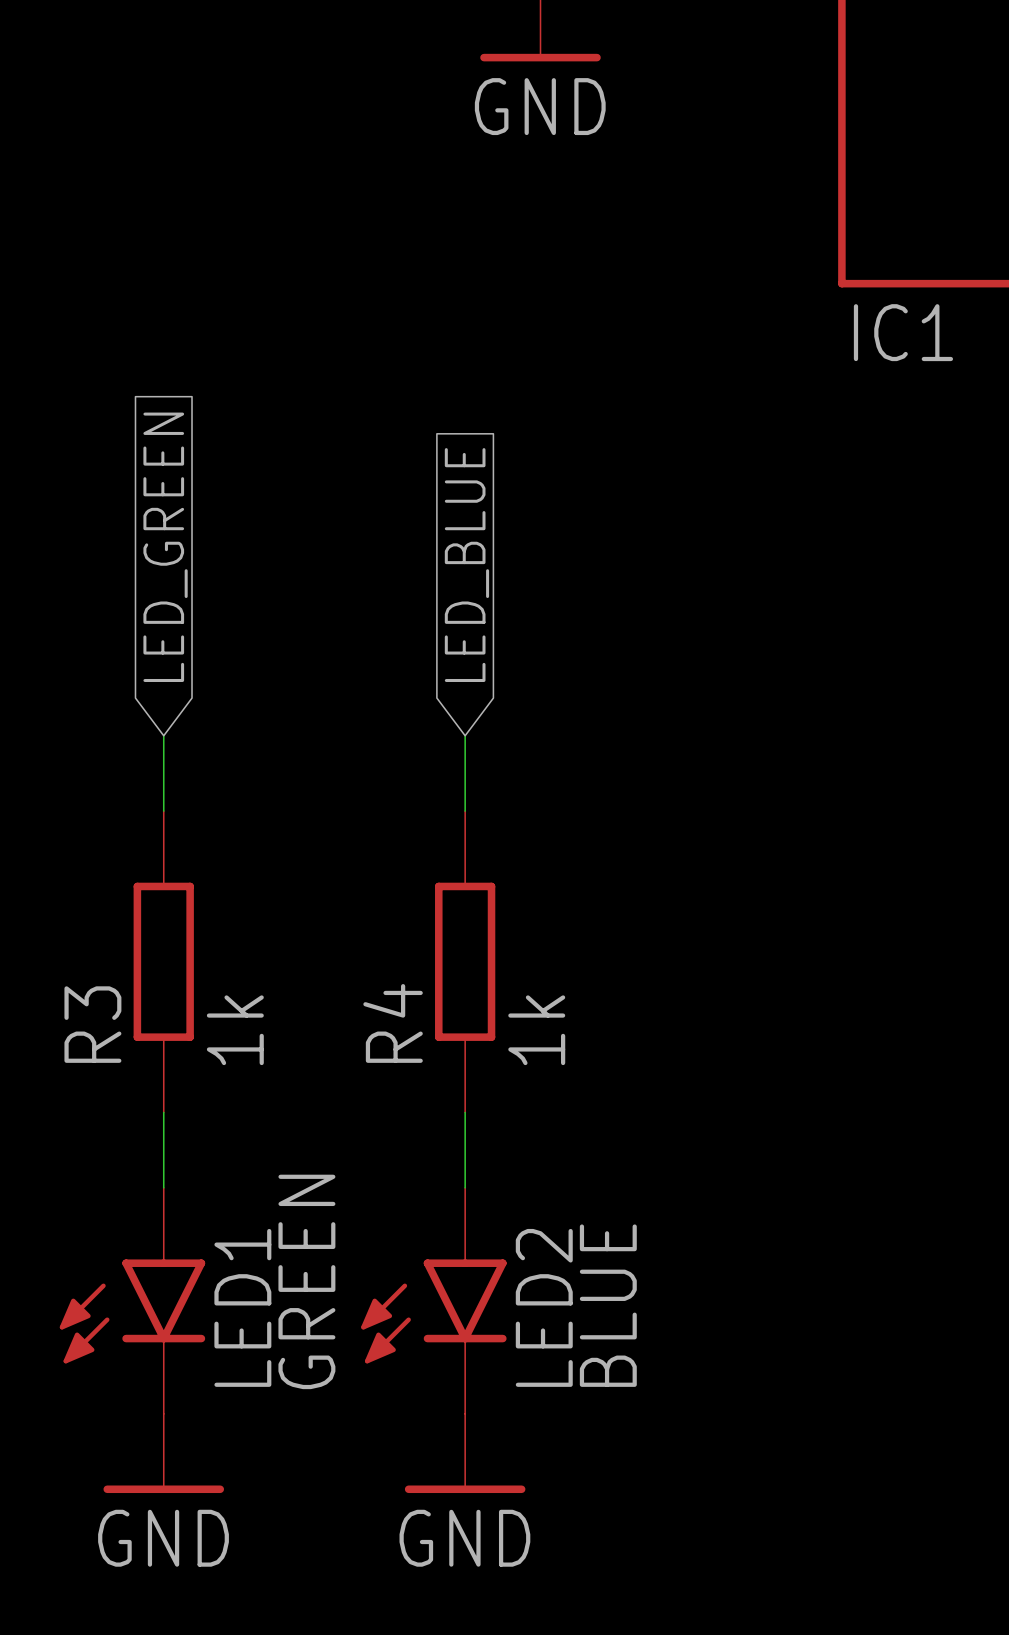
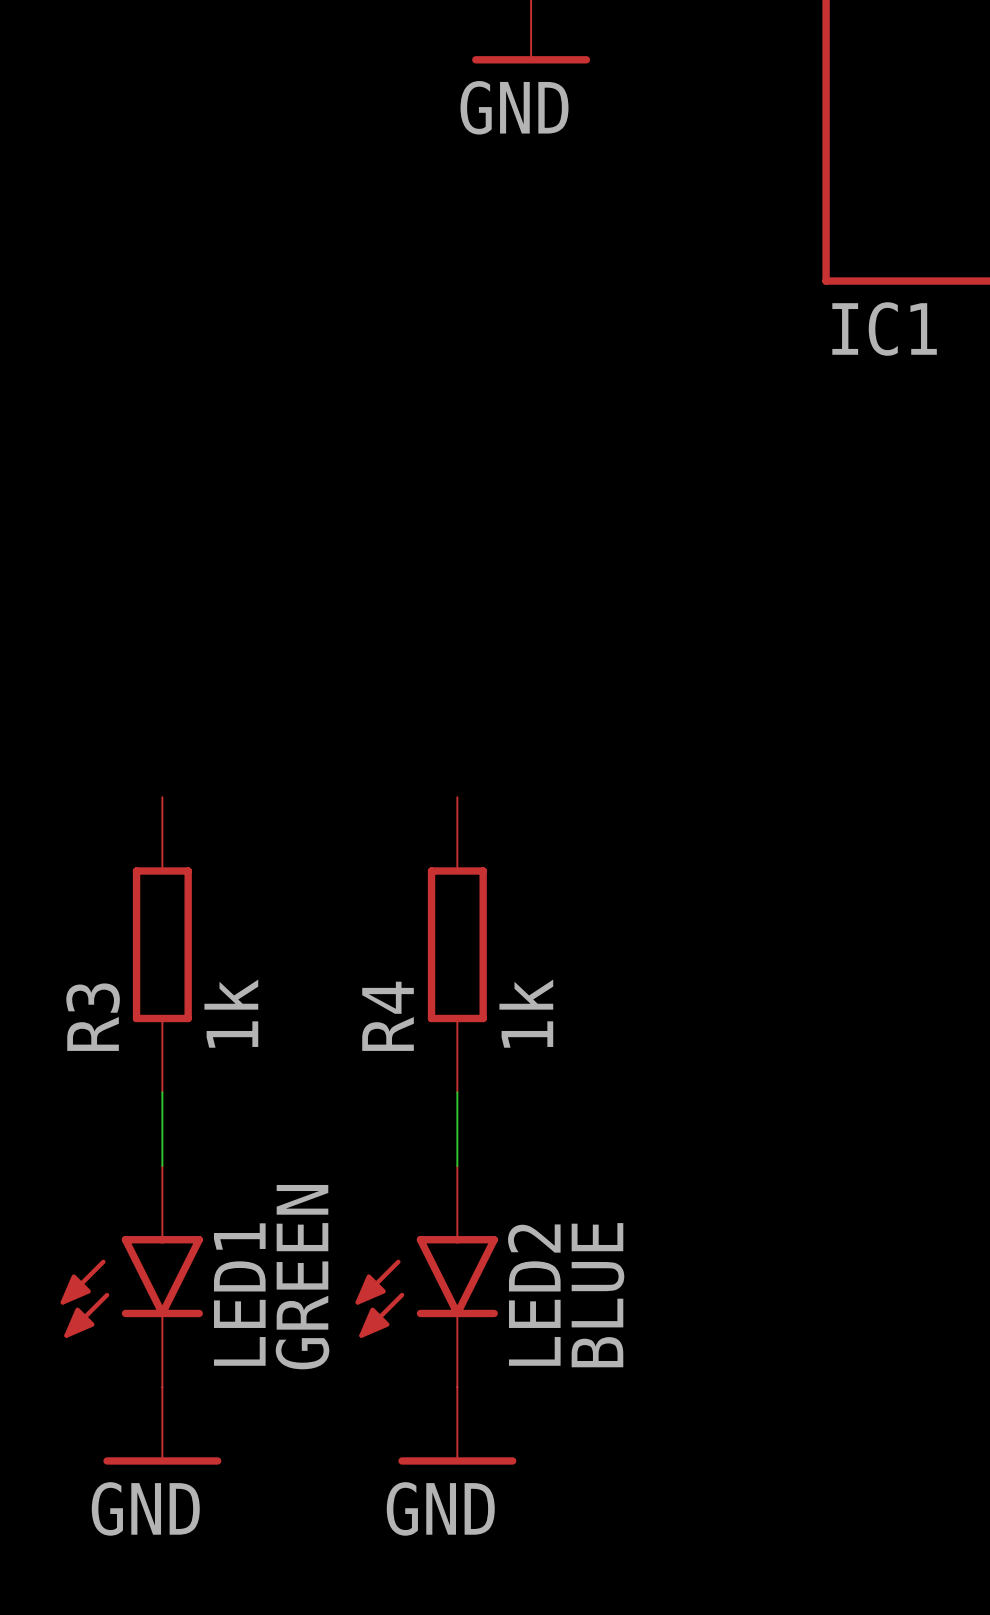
global label: LED_GREEN (165, 547) -> none
global label: LED_BLUE (466, 565) -> none
wire: (163, 735) (163, 811) -> none
wire: (465, 735) (465, 811) -> none

